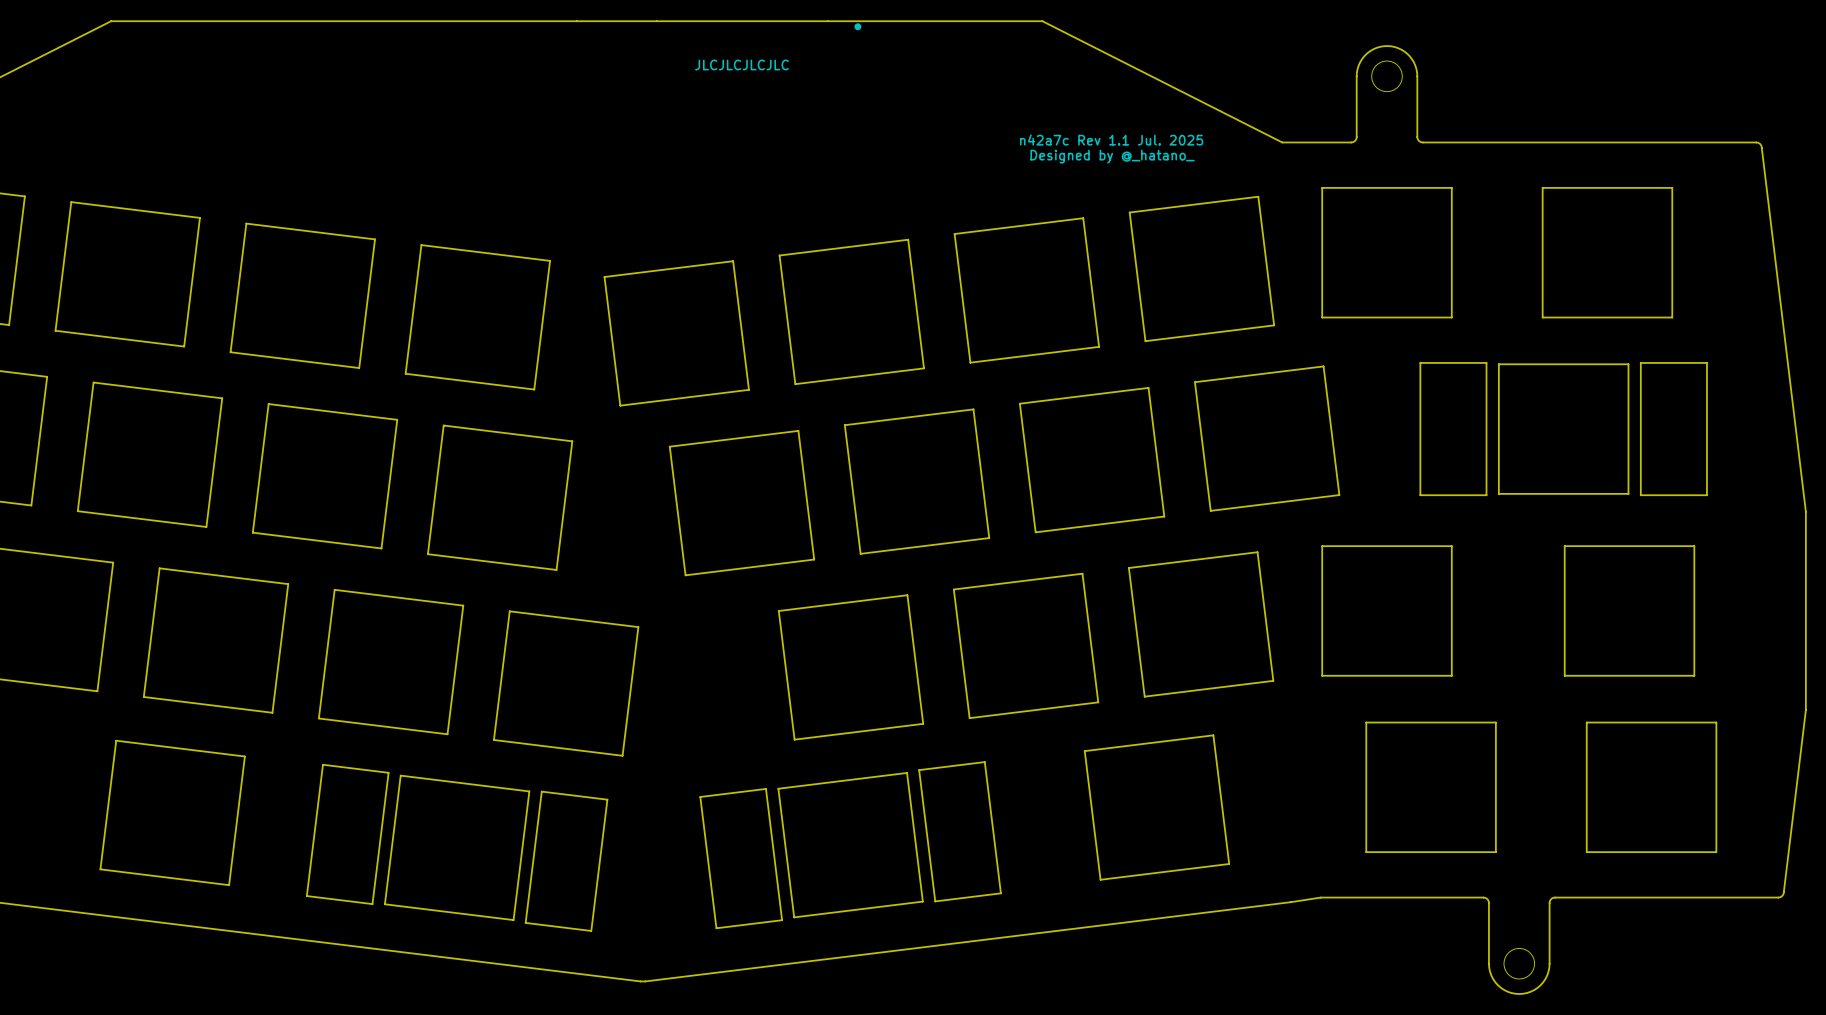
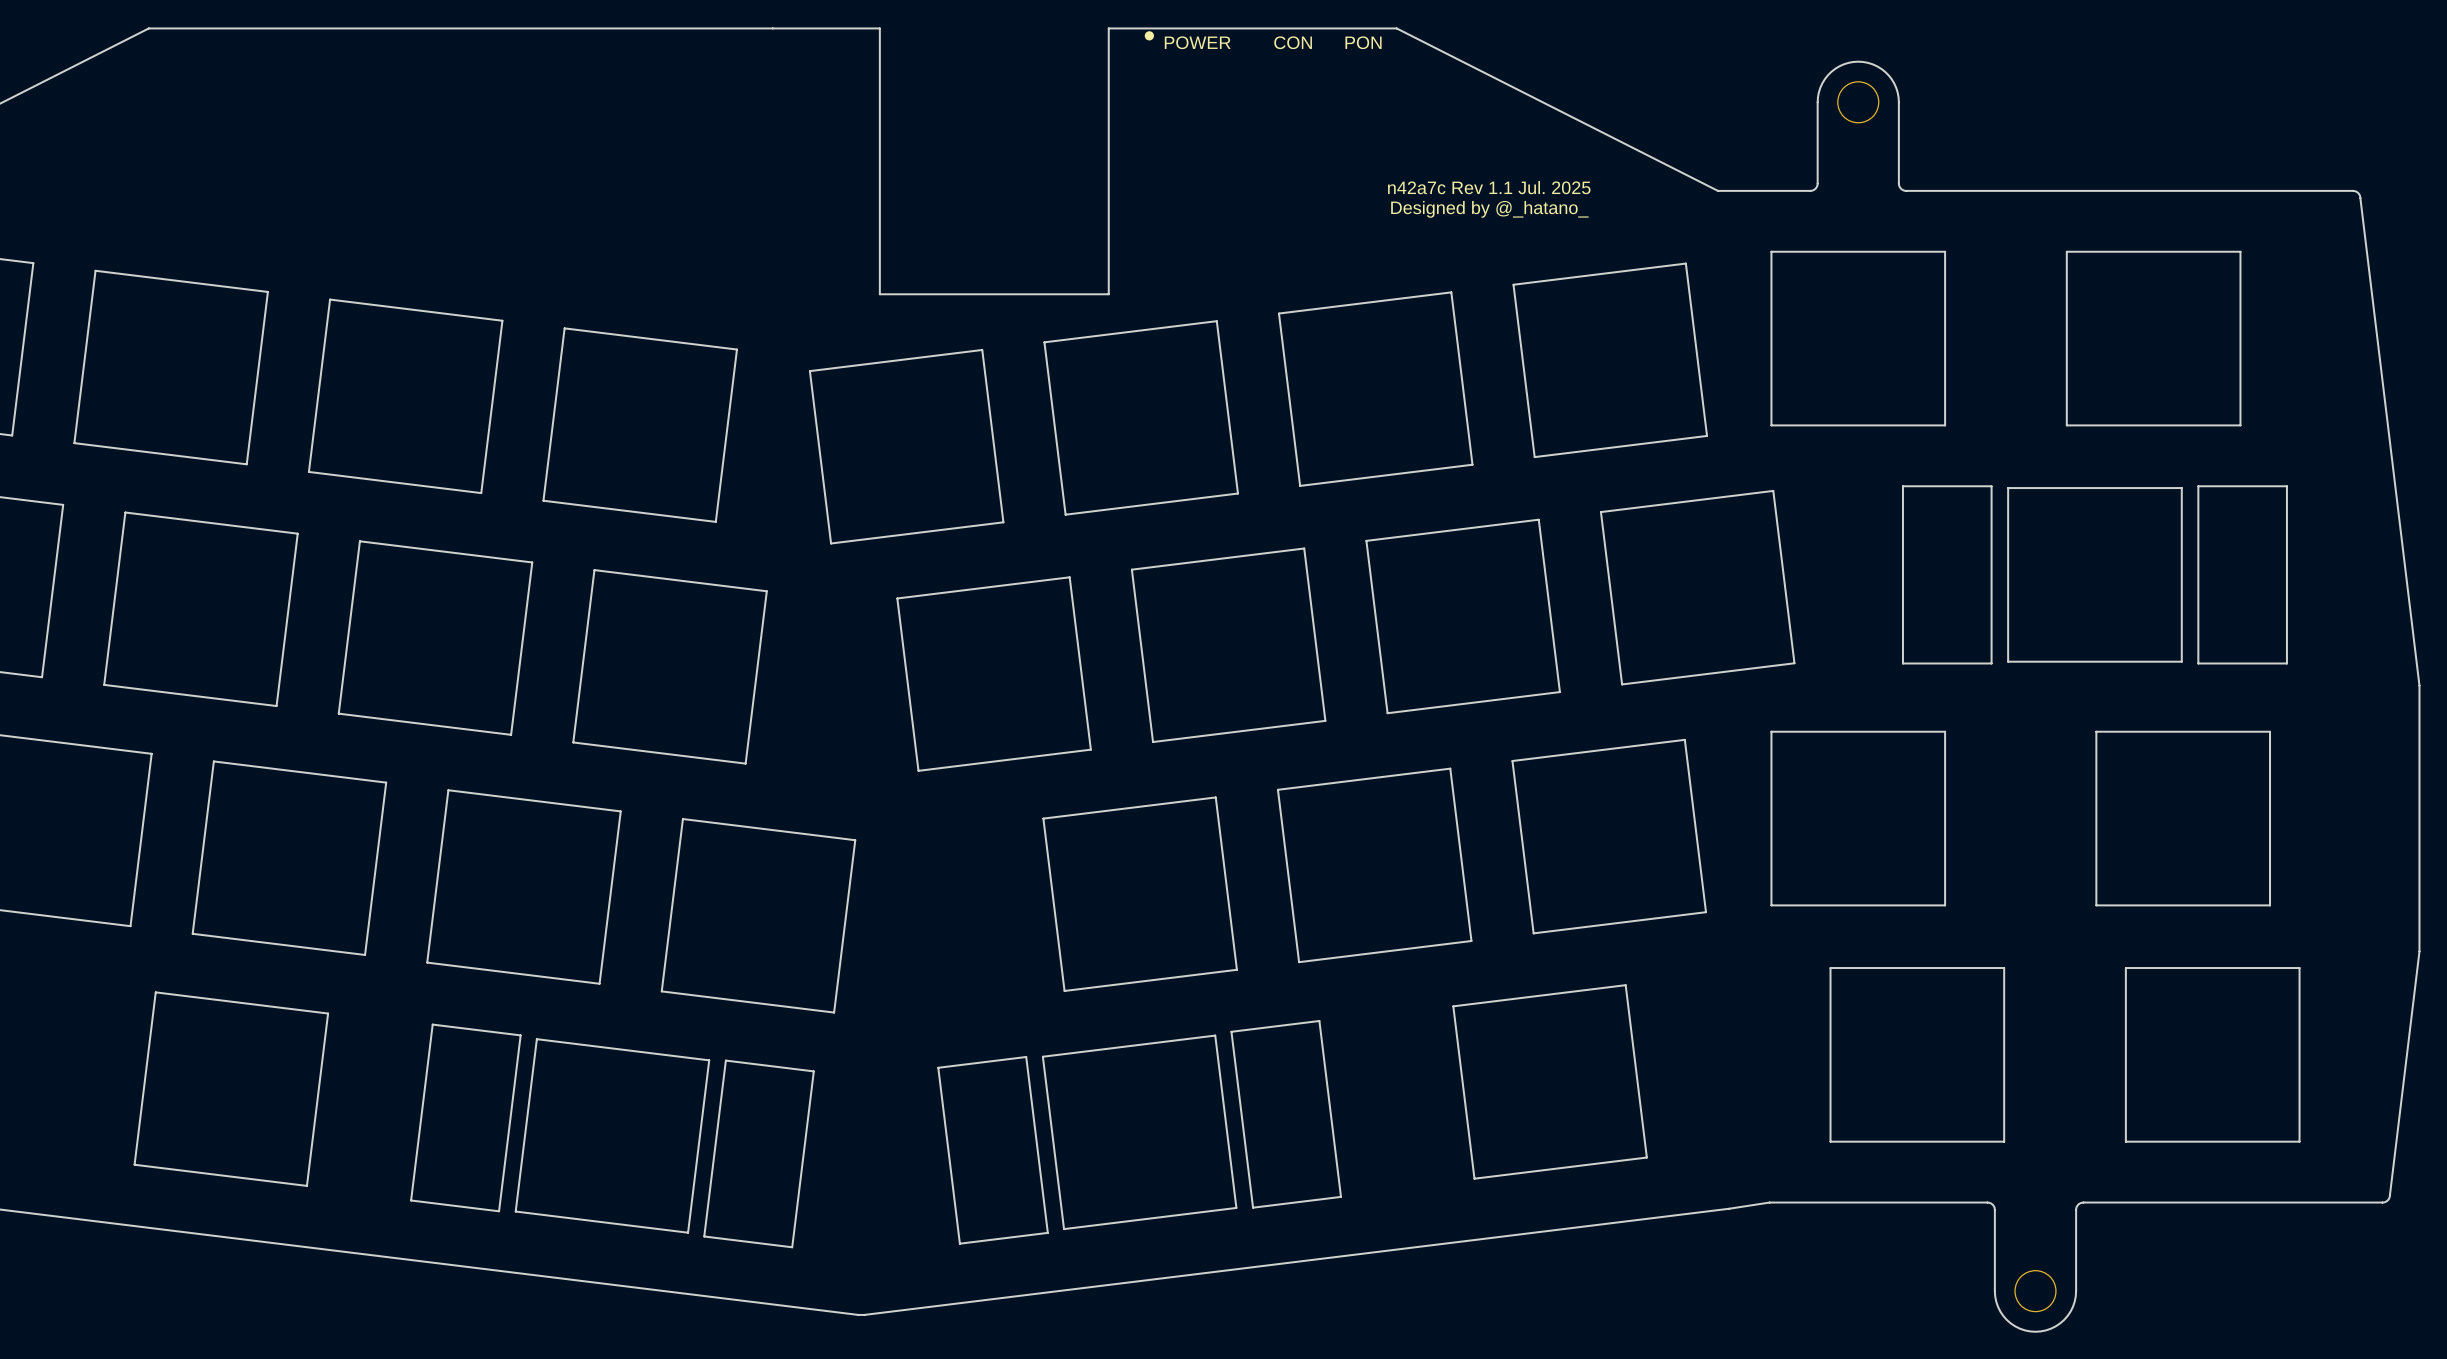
board edge: (656, 21) (827, 21) -> (879, 28) (879, 294) (1108, 294) (1108, 28)
text: none -> POWER (1197, 42)
text: none -> CON (1293, 42)
text: none -> PON (1363, 42)
text: JLCJLCJLCJLC (741, 64) -> none

